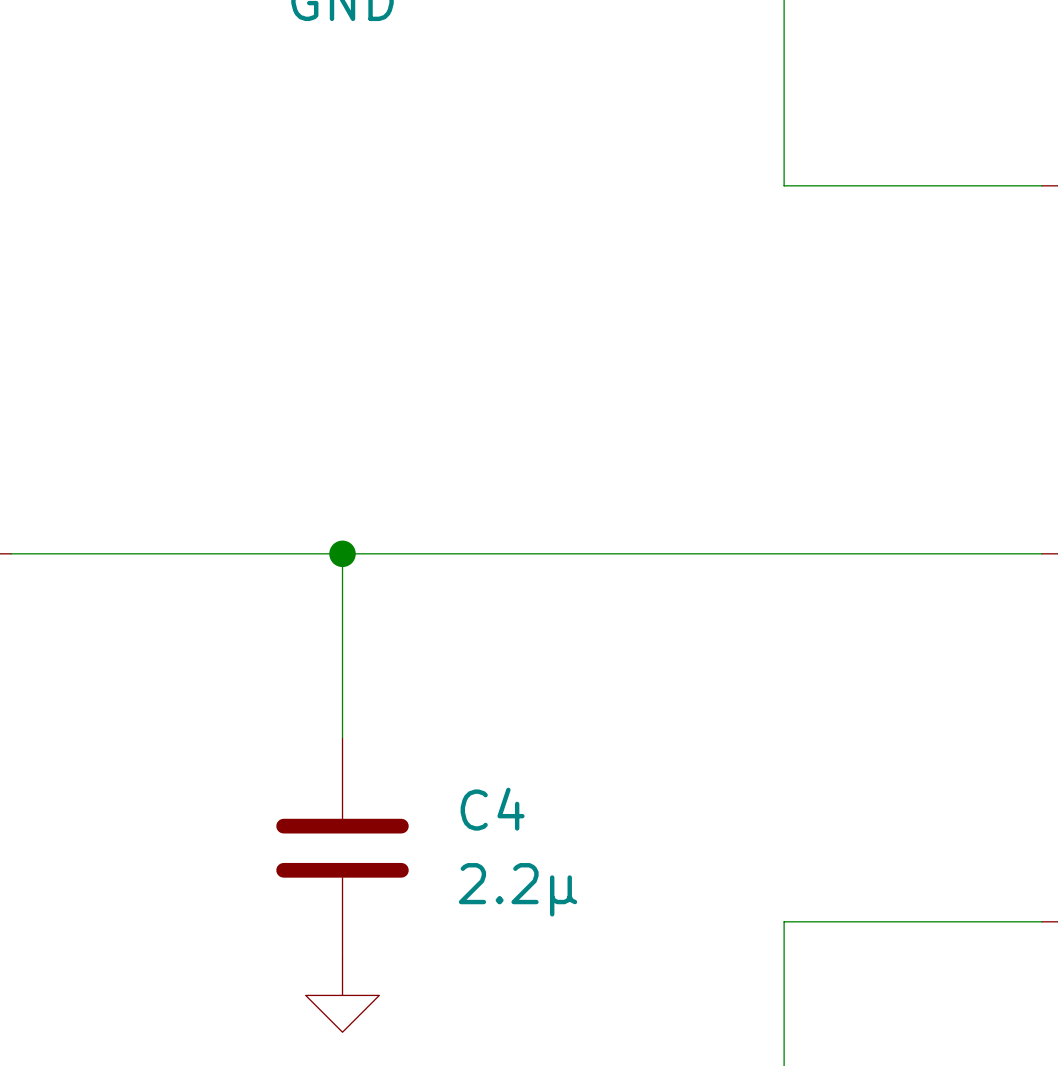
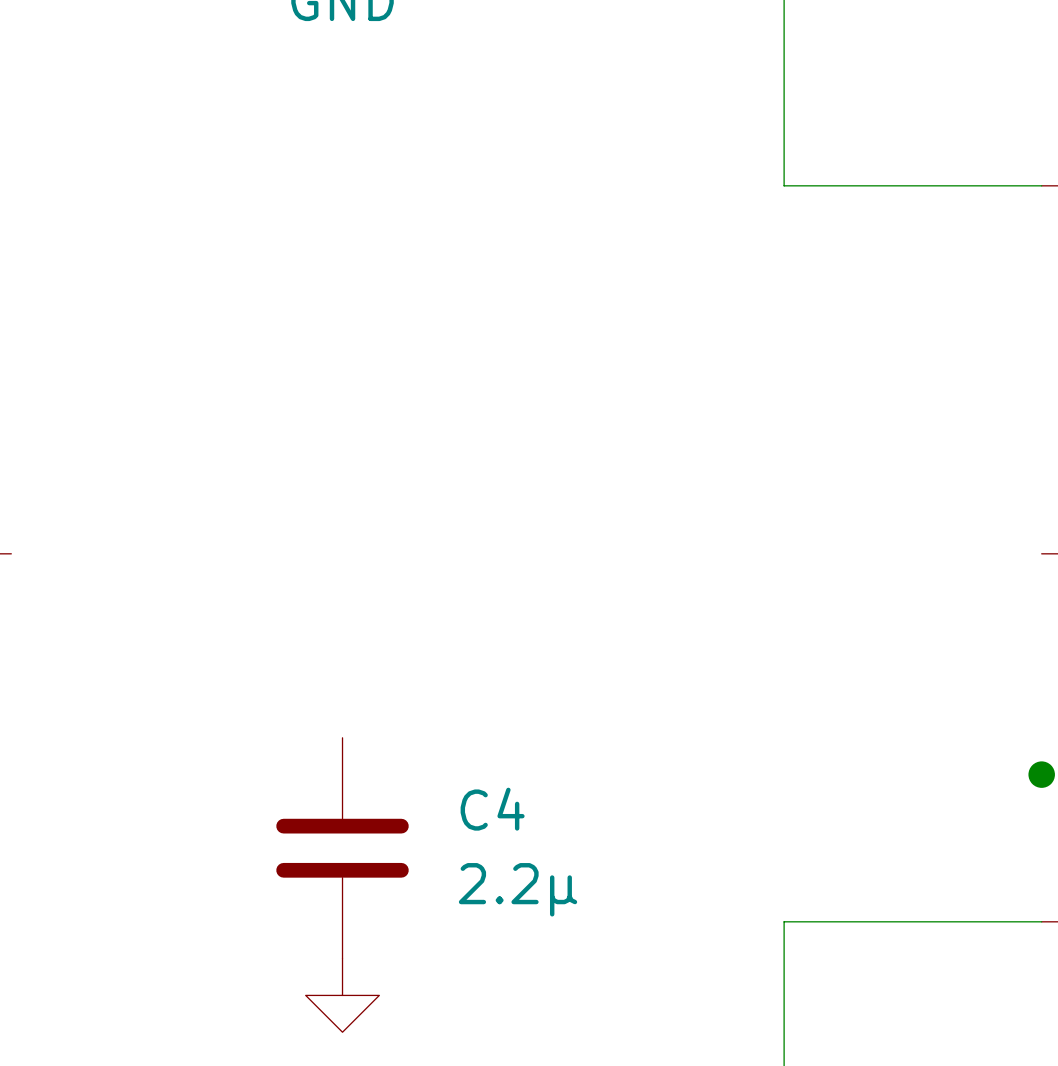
wire: (11, 553) (1041, 553) -> none
wire: (342, 553) (342, 737) -> none
junction: (342, 553) -> none
junction: none -> (1041, 774)

